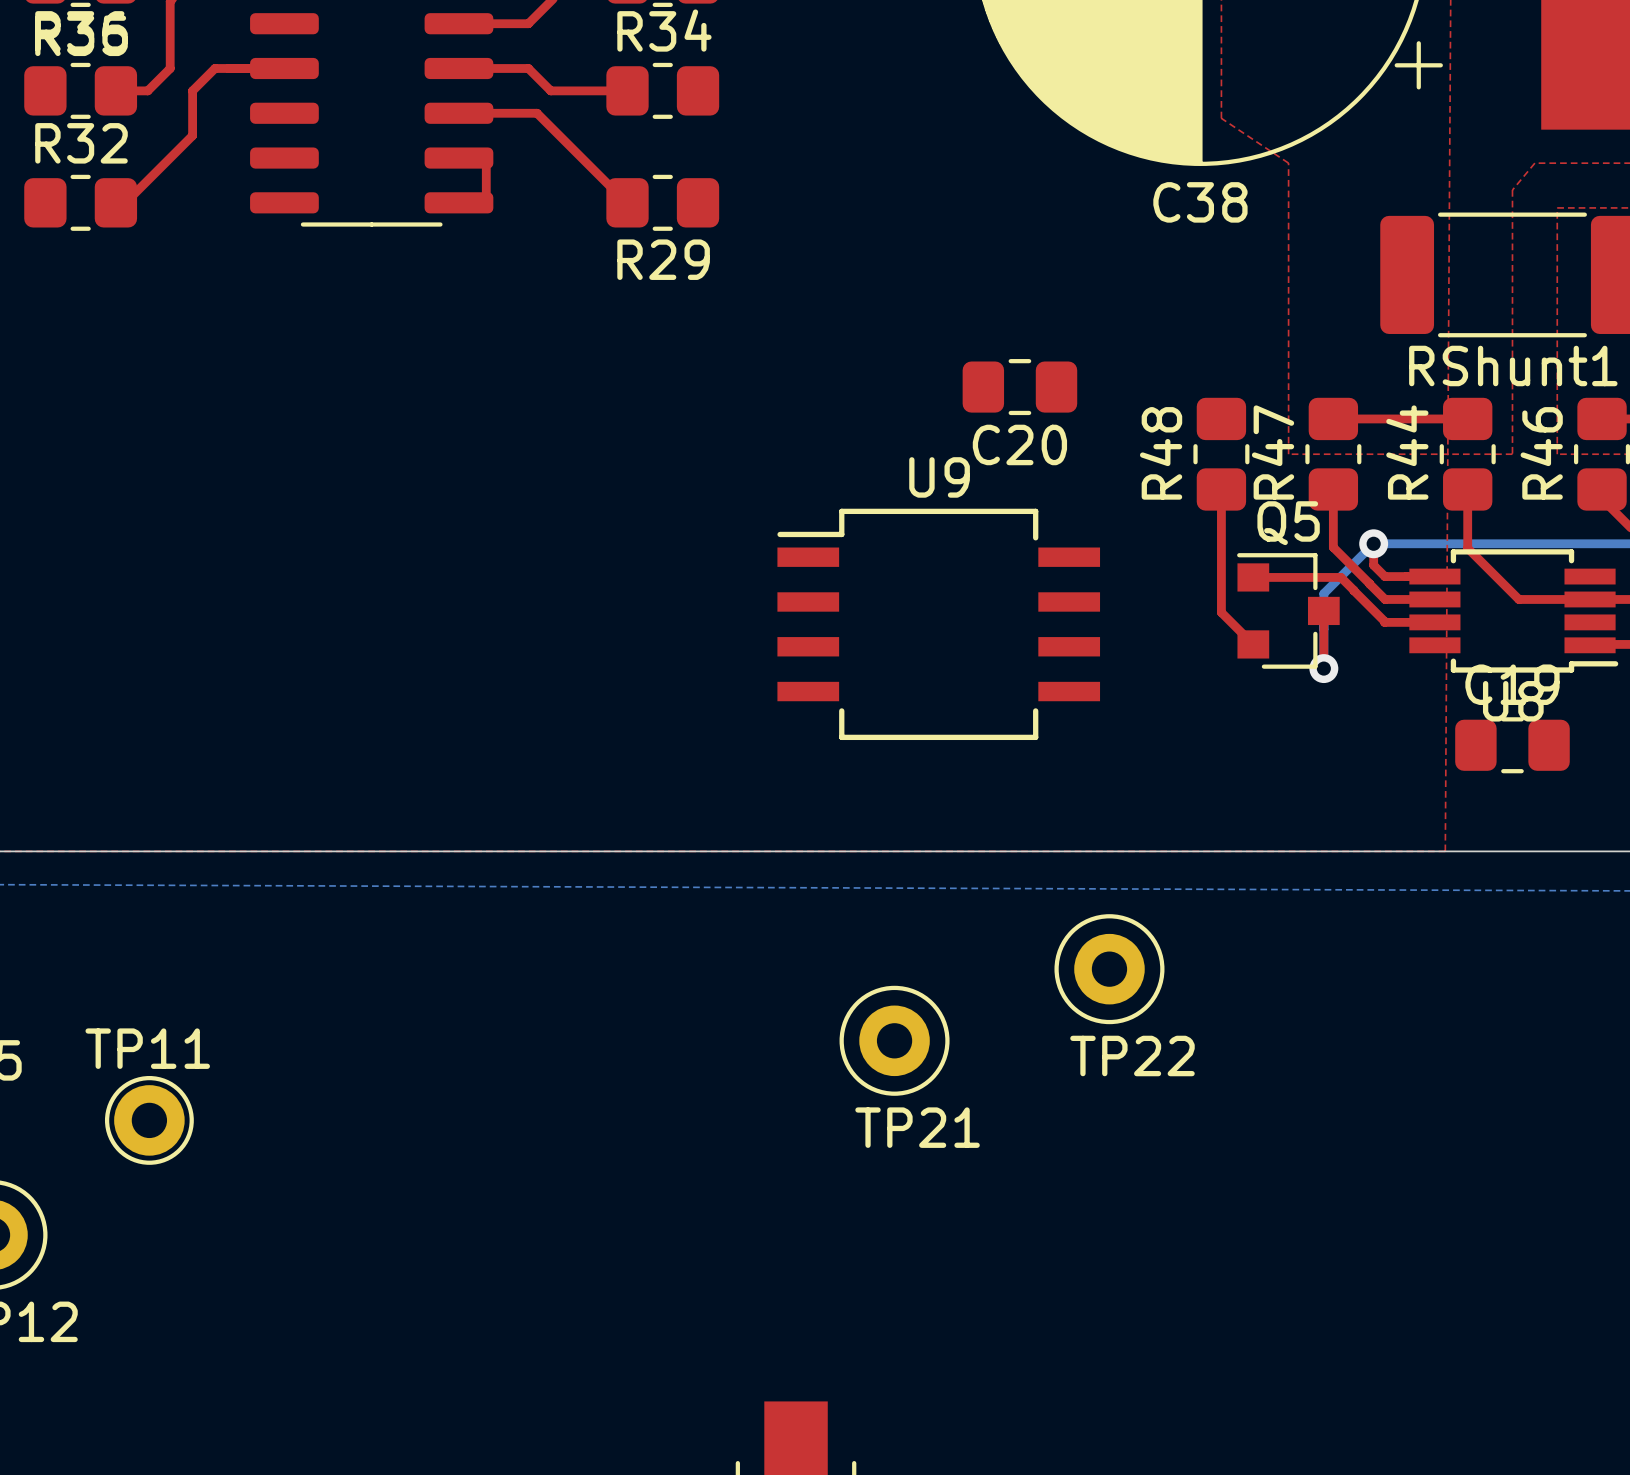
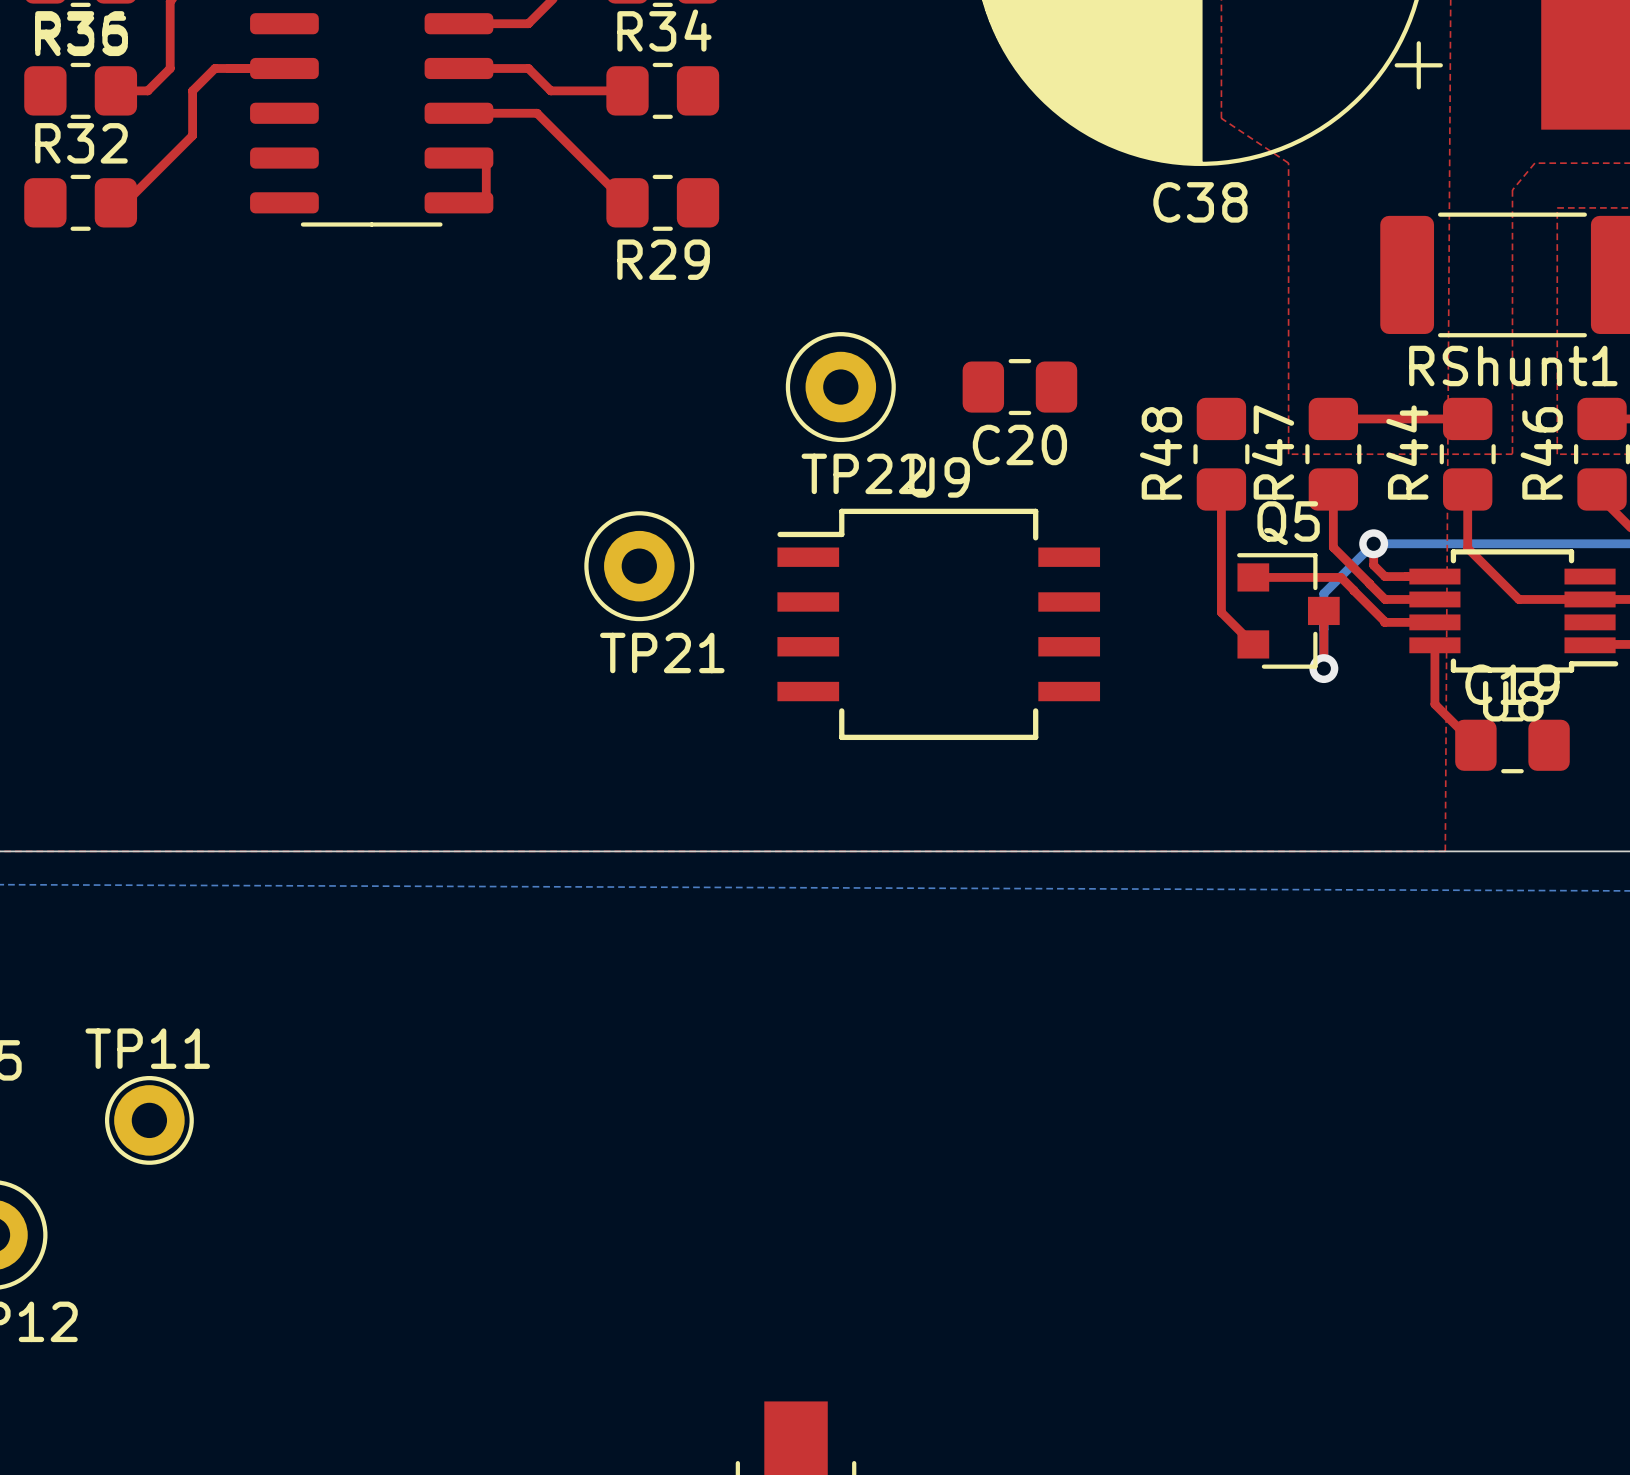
top track: none -> (1434, 645) (1434, 704) (1475, 745)
TP22 position: (1109, 969) -> (840, 387)
TP21 position: (894, 1040) -> (639, 566)

